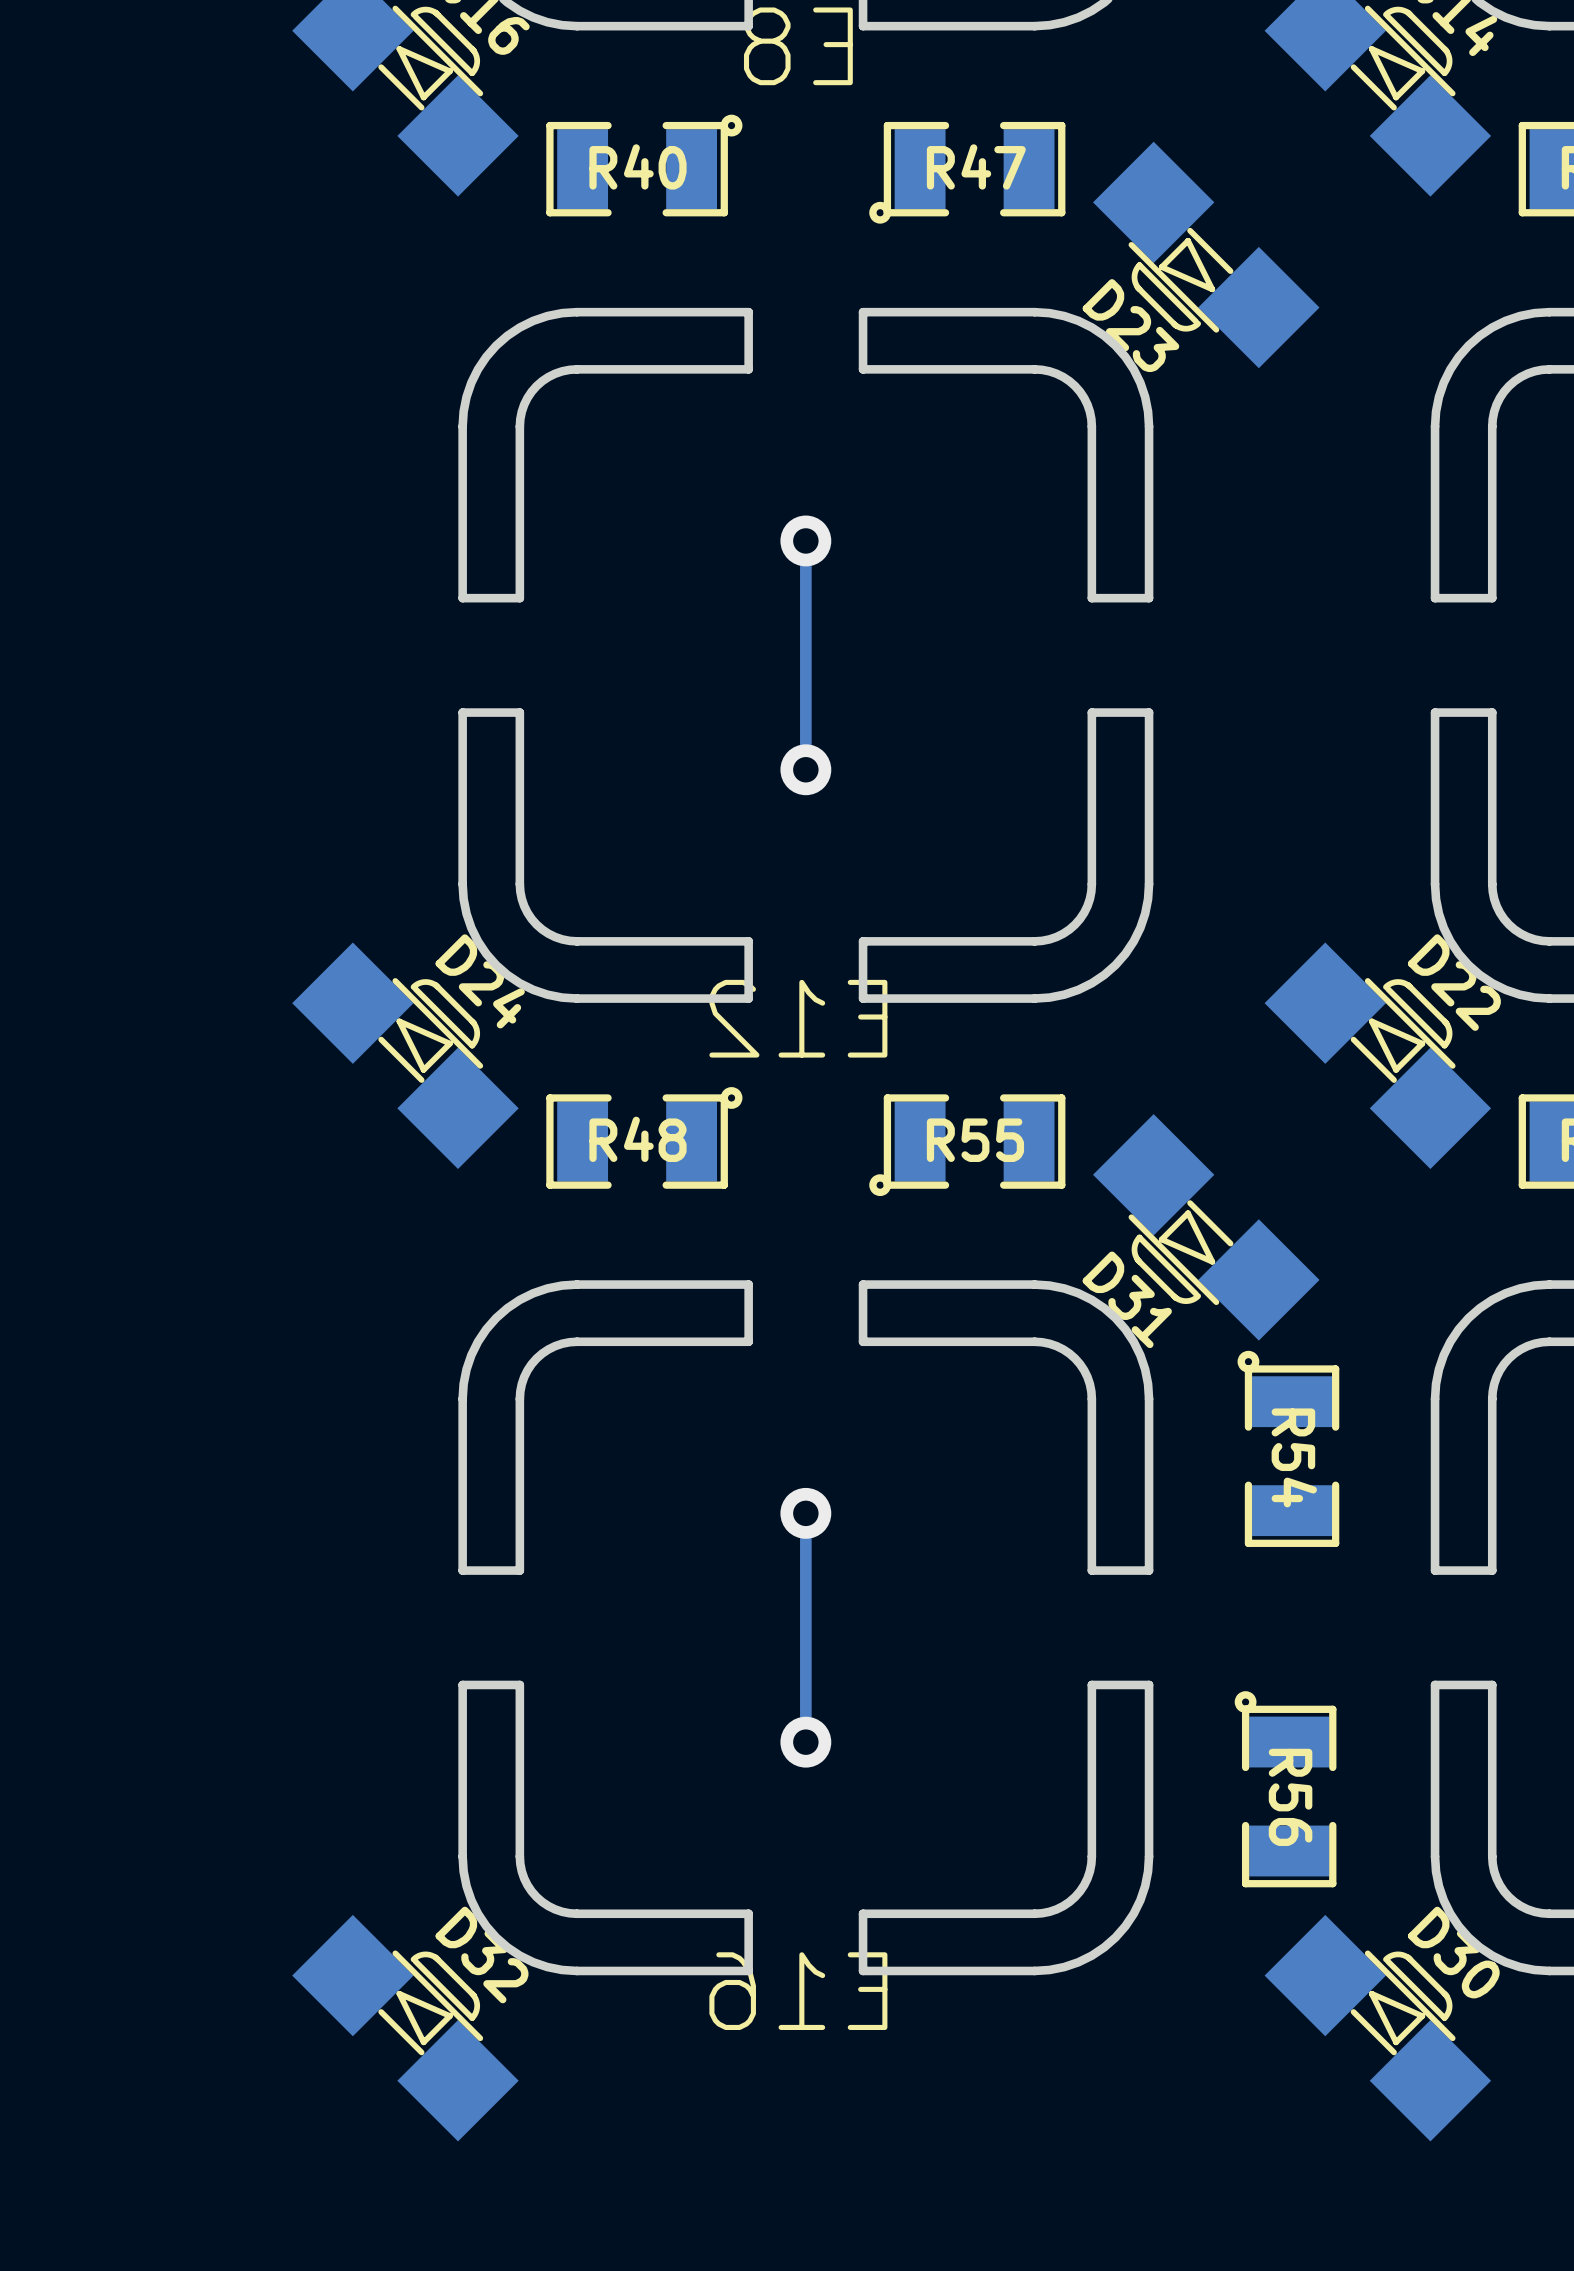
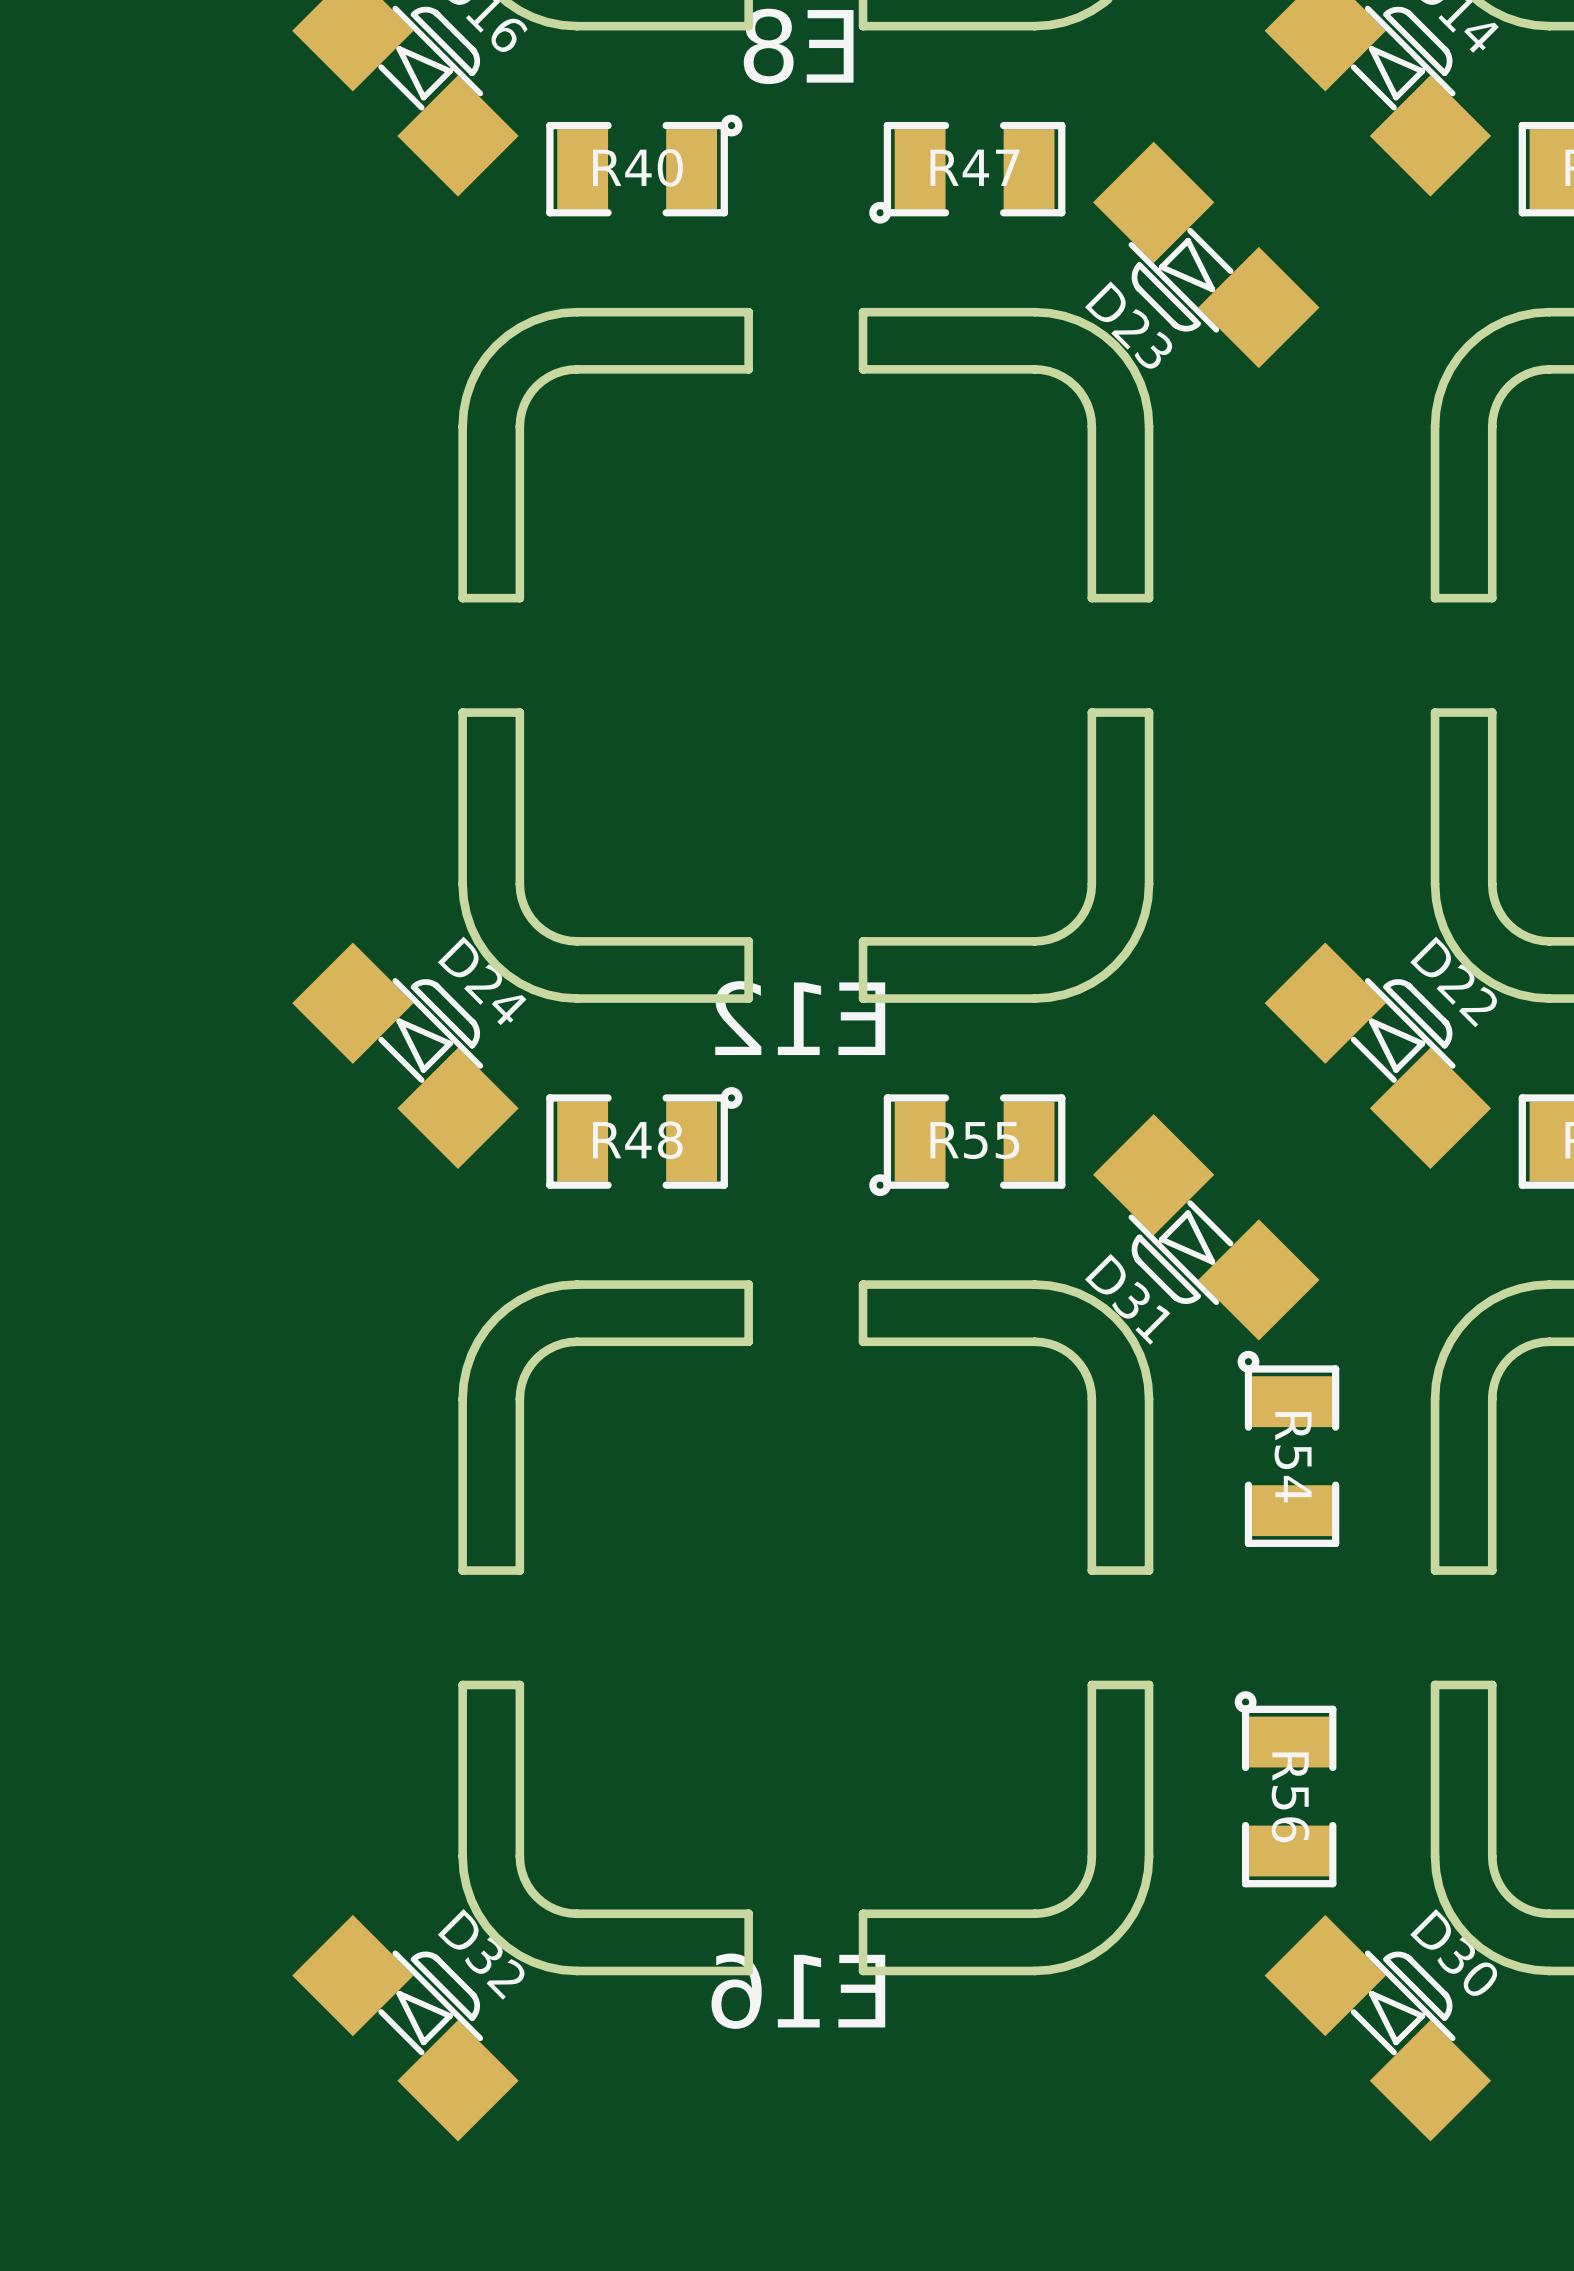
track: (805, 540) (805, 769) -> none
via: (805, 540) -> none
via: (805, 769) -> none
track: (805, 1513) (805, 1742) -> none
via: (805, 1513) -> none
via: (805, 1742) -> none

